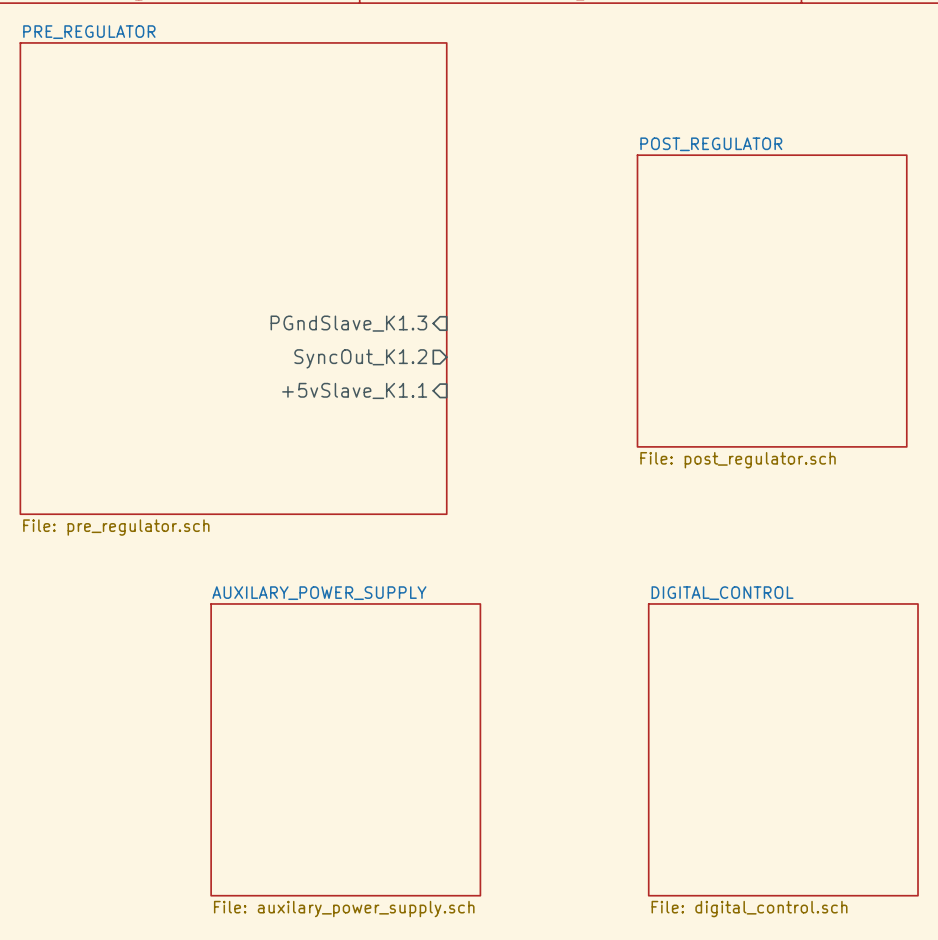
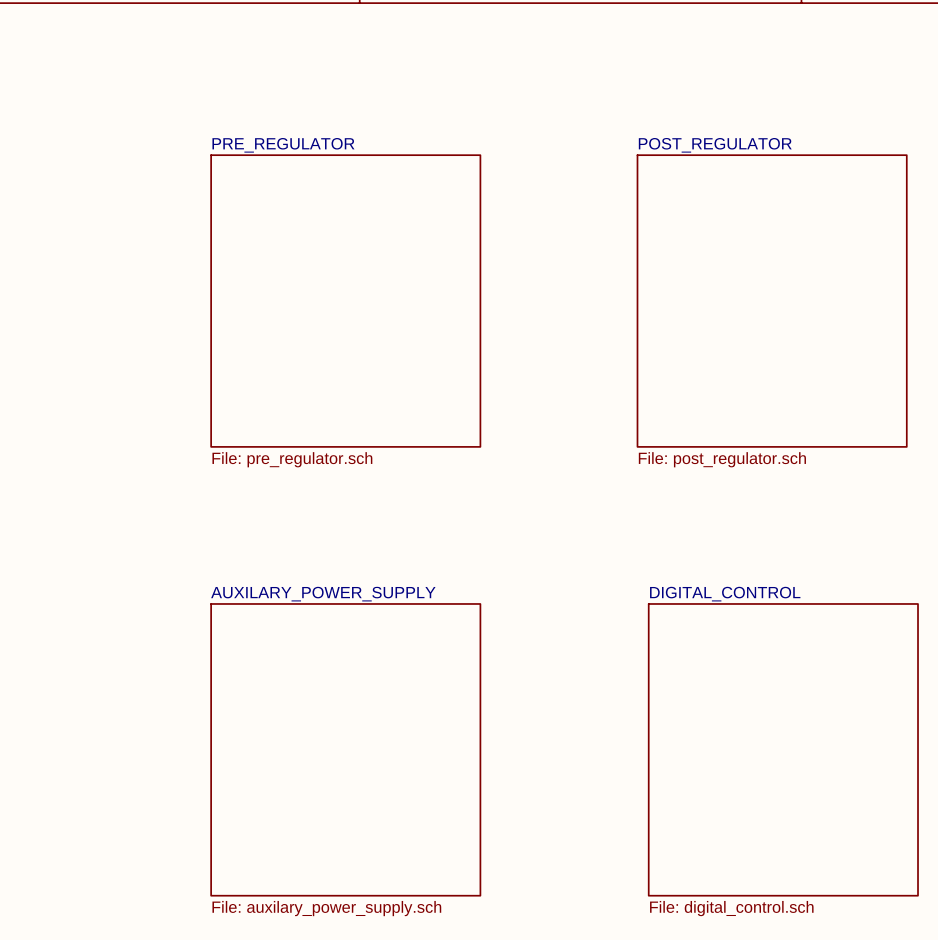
sheet PRE_REGULATOR: File: pre_regulator.sch (233, 278) -> none
sheet PRE_REGULATOR: none -> File: pre_regulator.sch (345, 301)
sheet pin: PGndSlave_K1.3 (348, 323) -> none
sheet pin: SyncOut_K1.2 (360, 358) -> none
sheet pin: +5vSlave_K1.1 (354, 390) -> none

